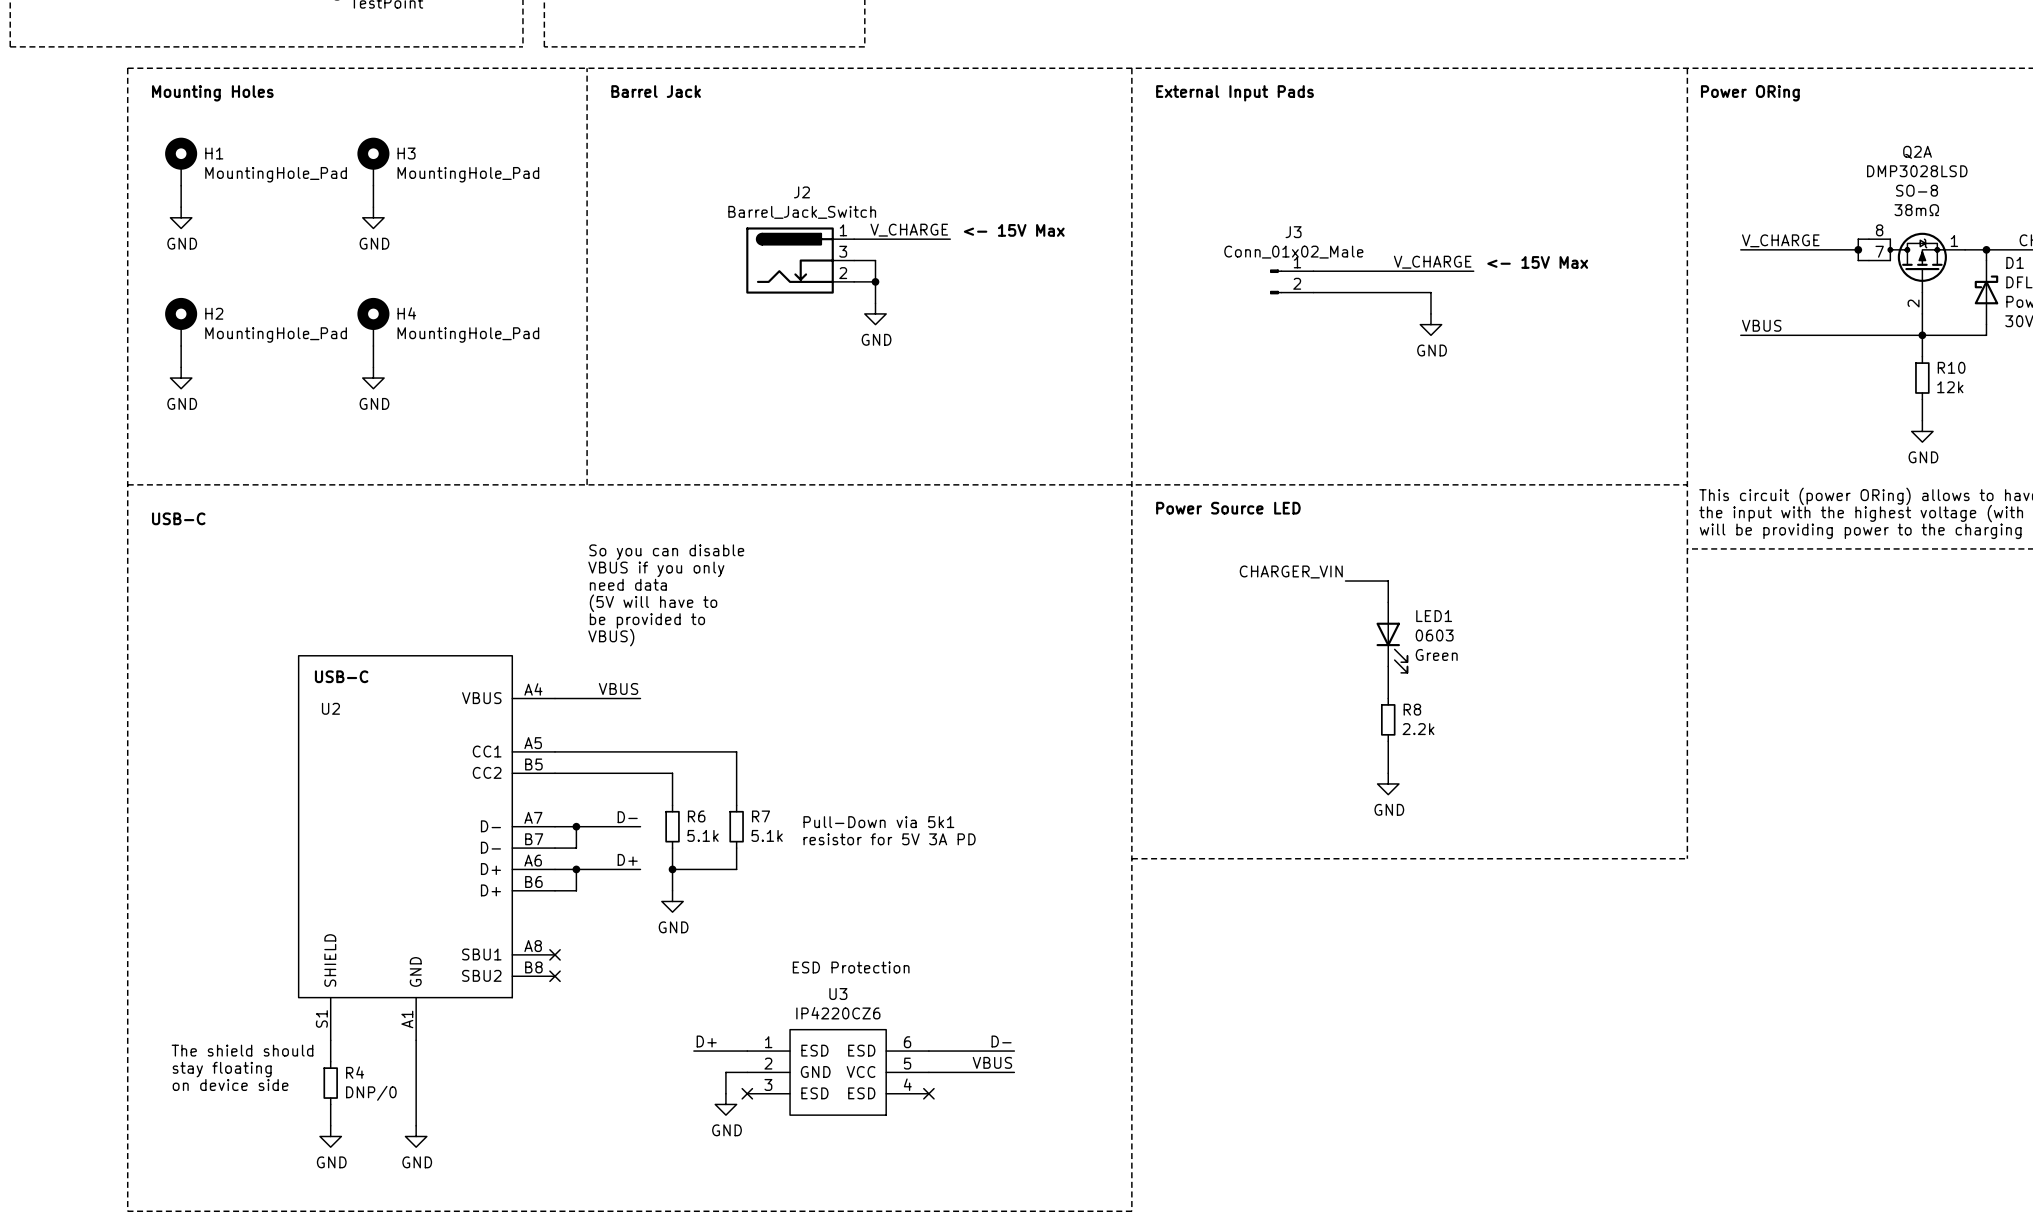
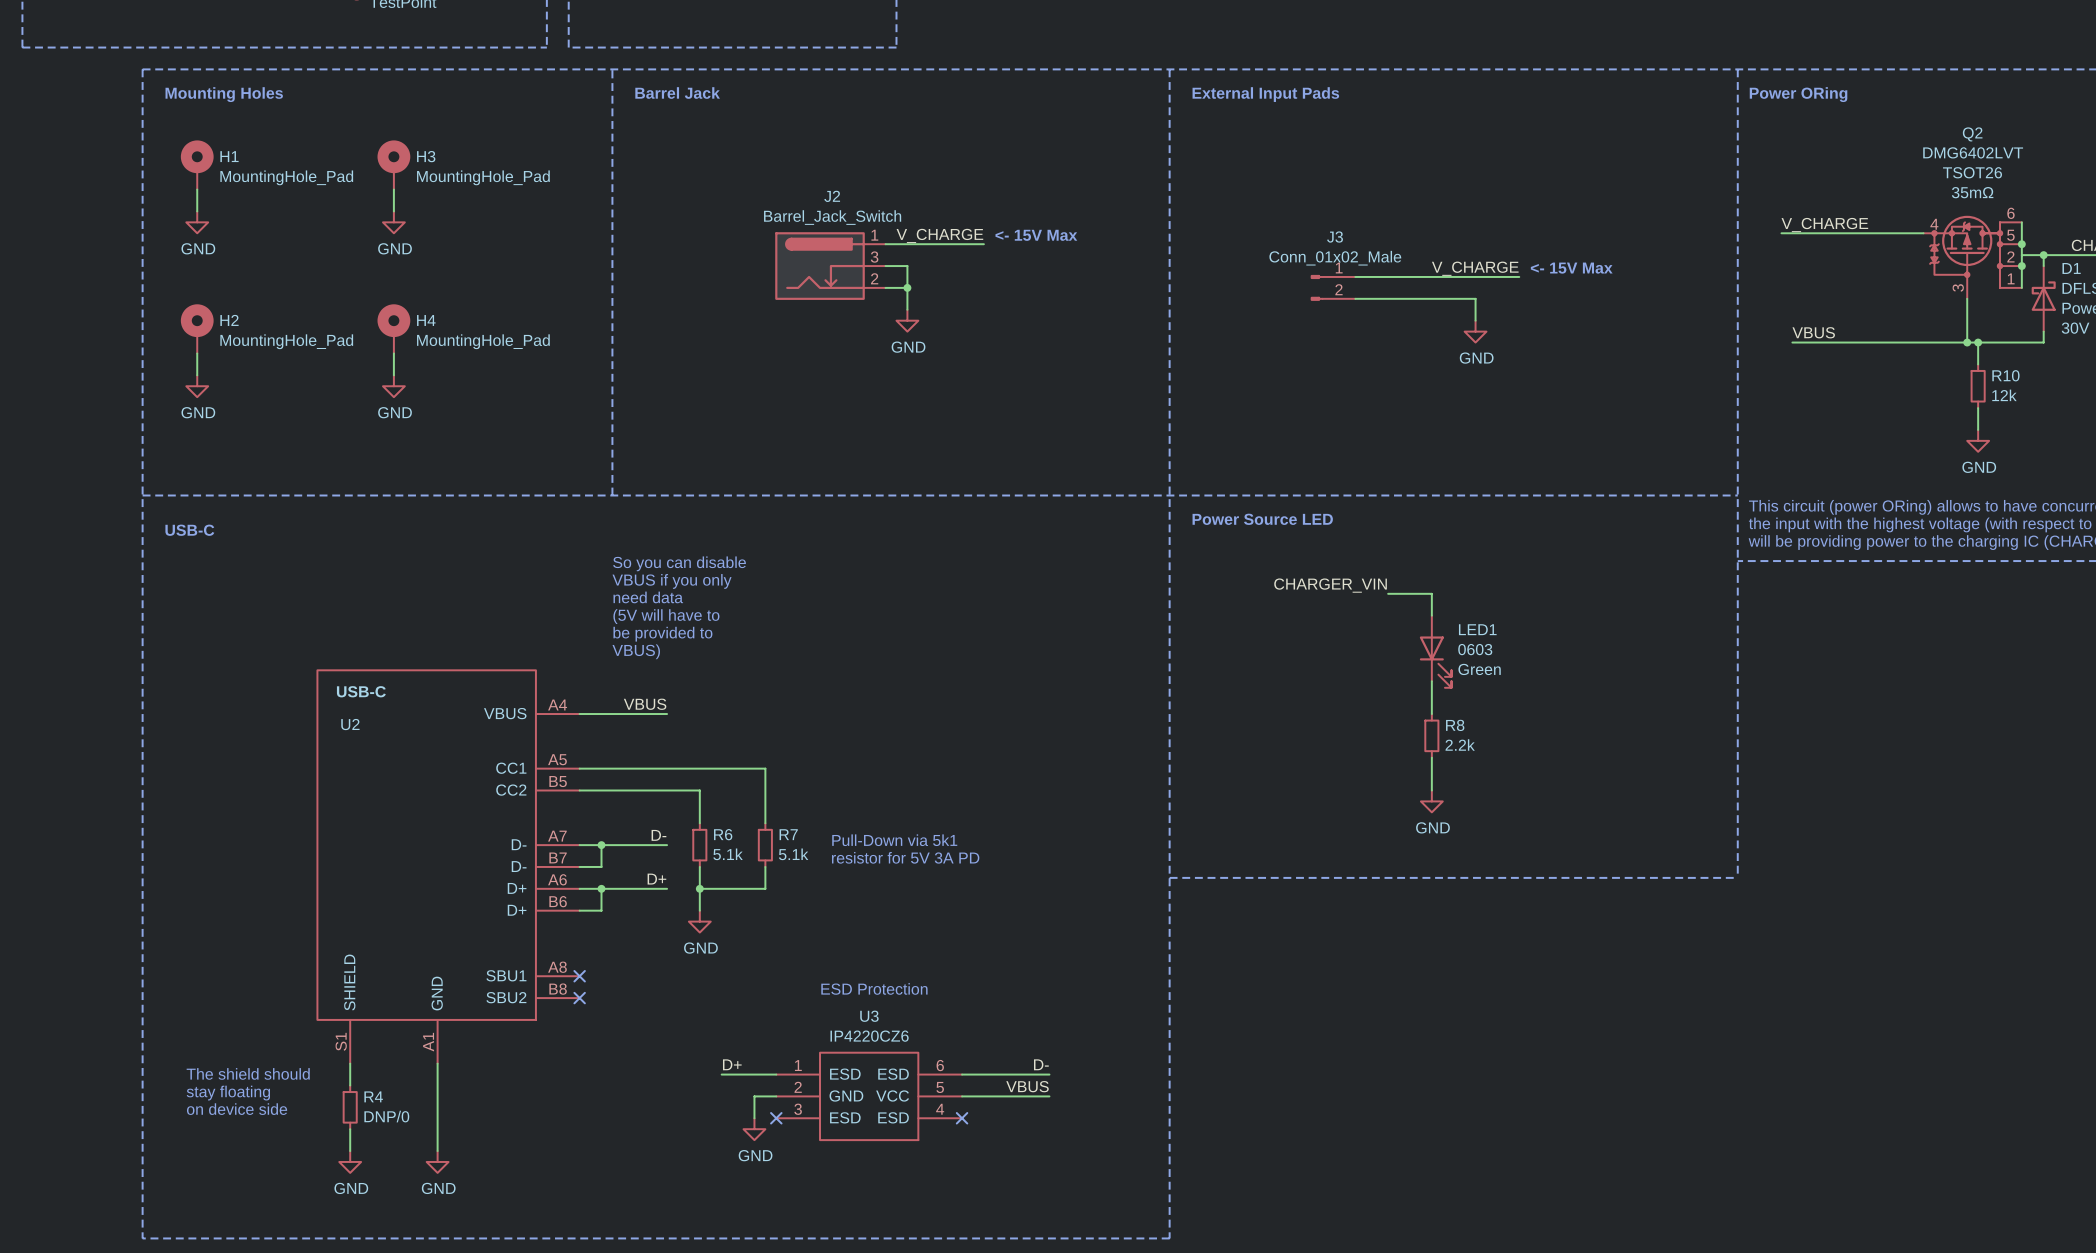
wire: none -> (2021, 222) (2021, 287)
wire: none -> (1781, 233) (1923, 233)
wire: (1868, 239) (1858, 239) (1858, 260) (1868, 260) -> none
junction: none -> (2021, 244)
label position: V_CHARGE (1780, 240) -> V_CHARGE (1824, 225)
wire: (1740, 249) (1858, 249) -> none
junction: (1858, 249) -> none
Q2: none -> DMG6402LVT (1972, 257)
junction: none -> (2021, 266)
Q2A: DMP3028LSD (1917, 273) -> none
wire: none -> (1967, 298) (1967, 342)
wire: (1922, 313) (1922, 335) -> none
junction: none -> (1967, 342)

